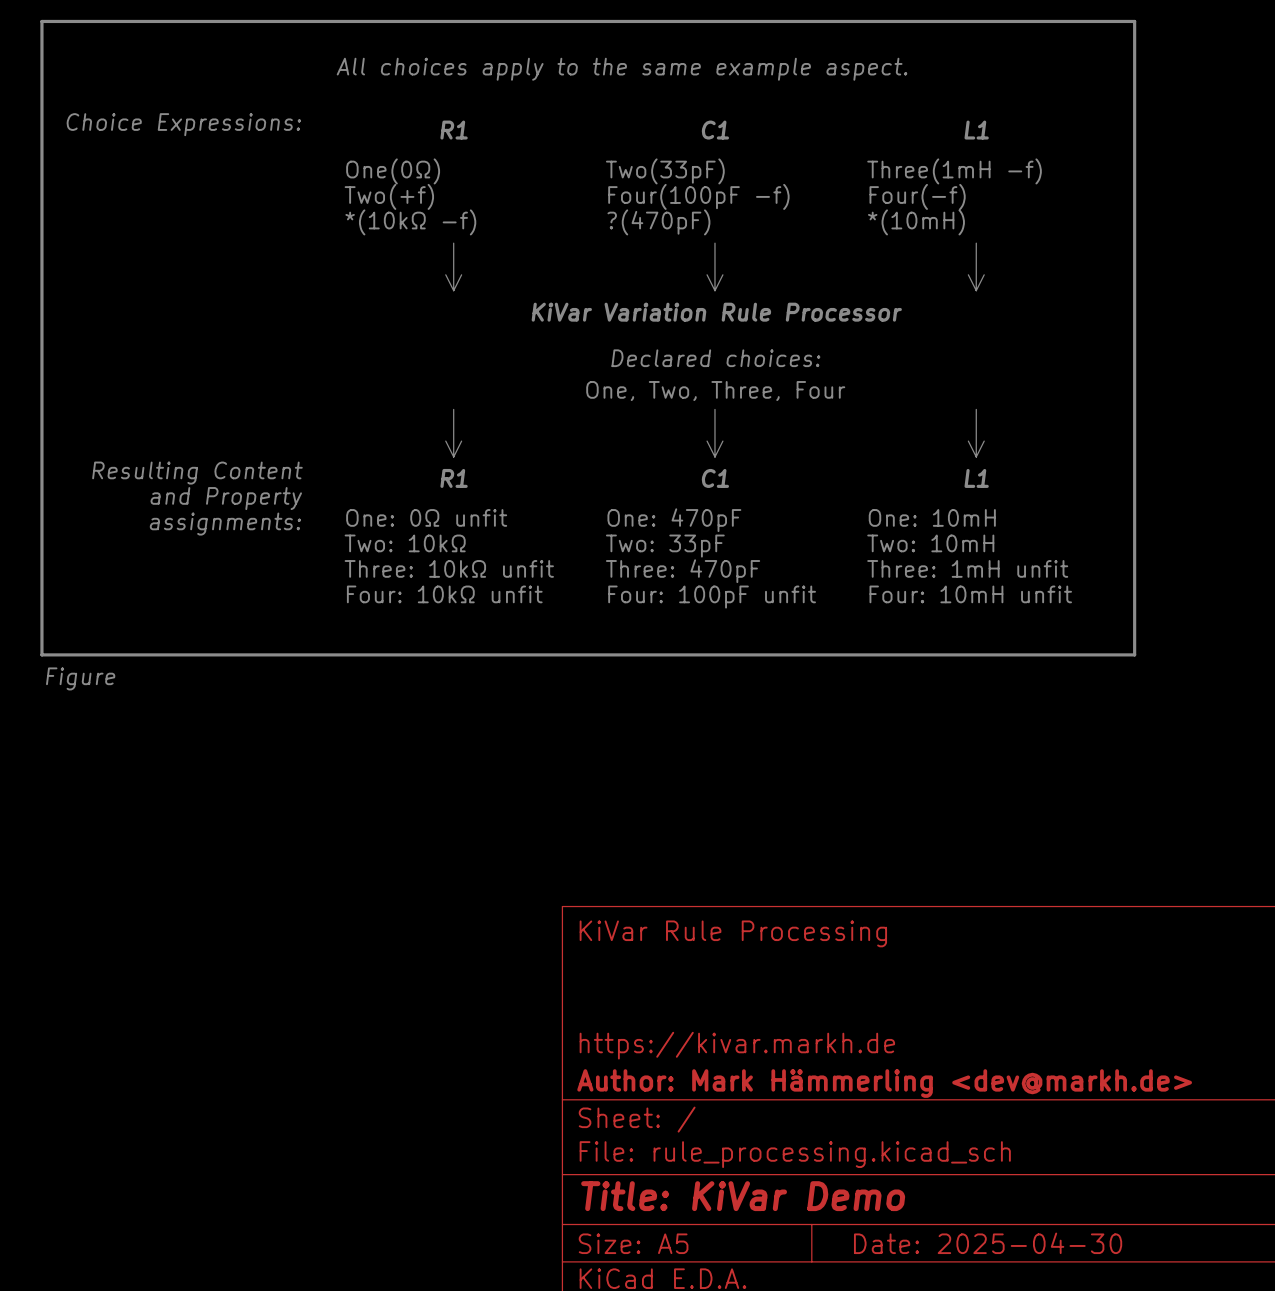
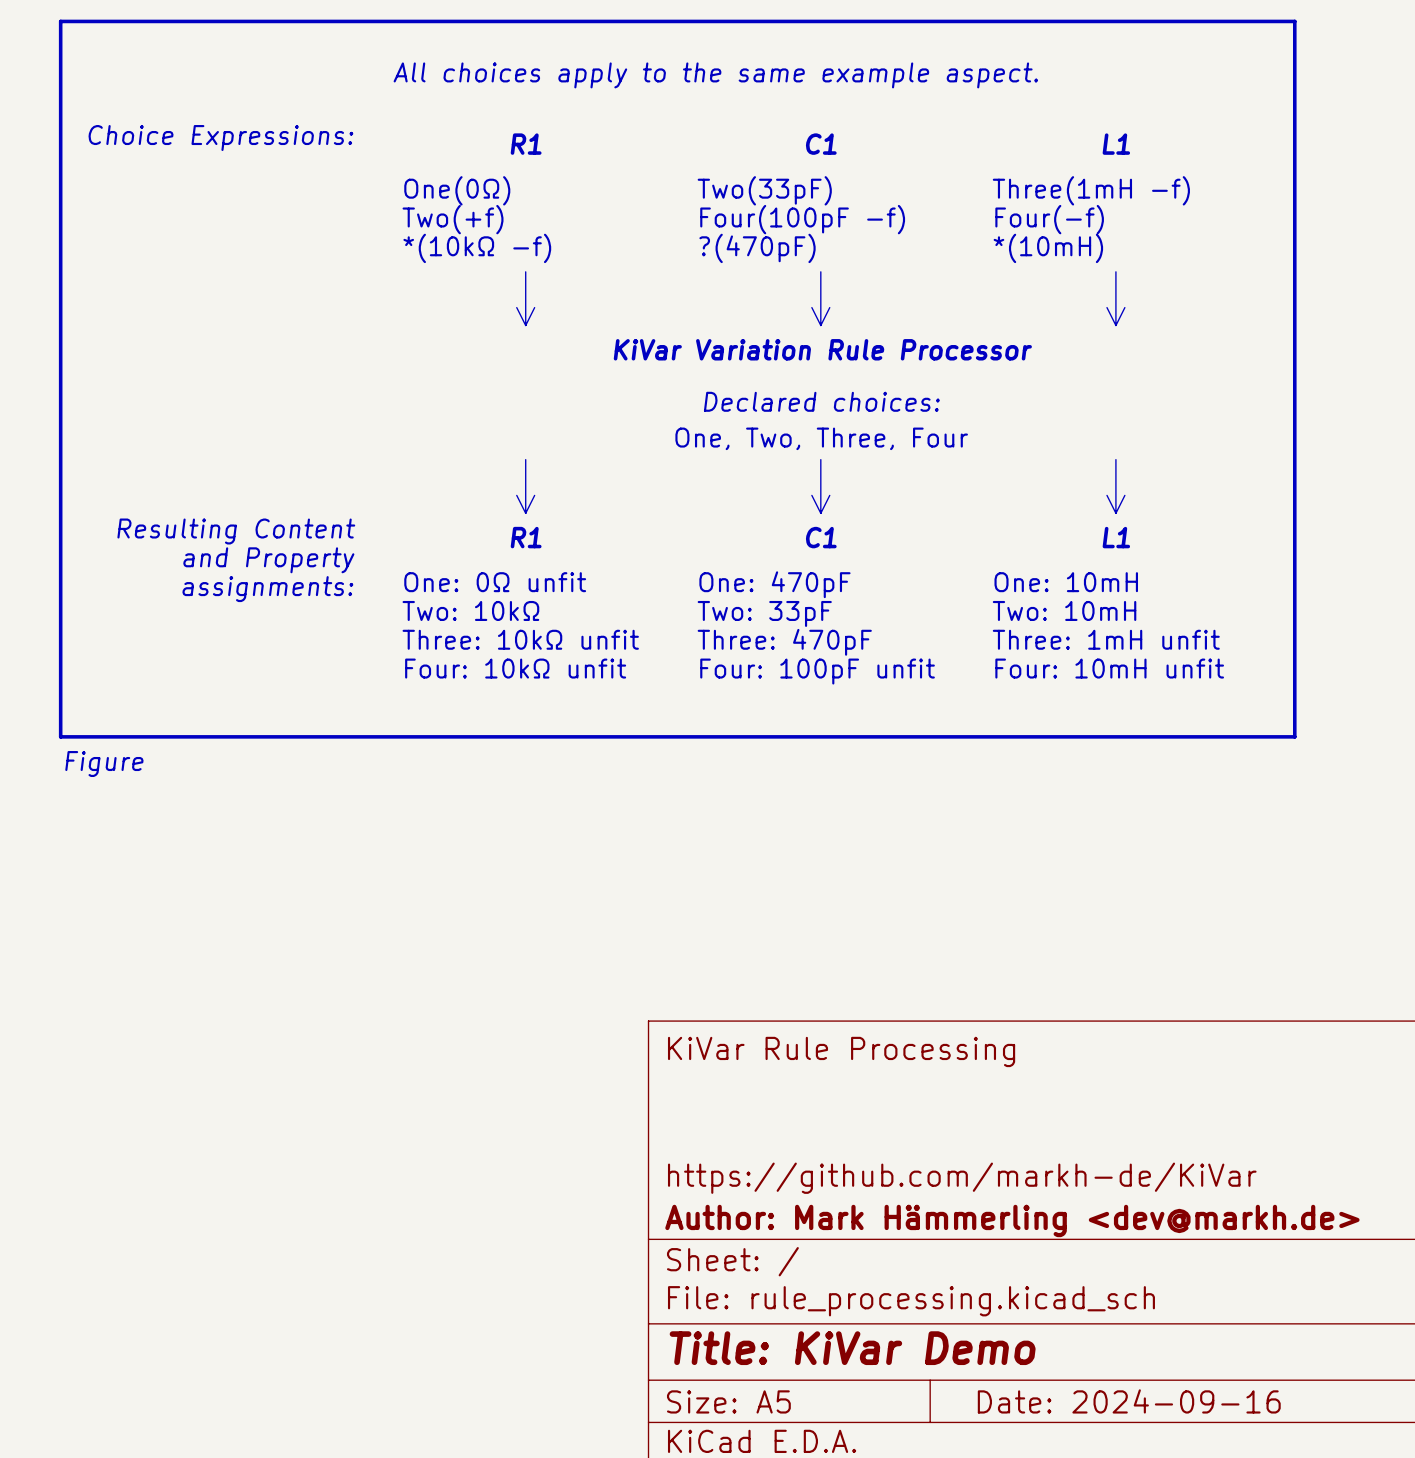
title block: https://kivar.markh.de (737, 1045) -> https://github.com/markh-de/KiVar (962, 1178)
title block: Date: 2025-04-30 (988, 1243) -> Date: 2024-09-16 (1129, 1401)

